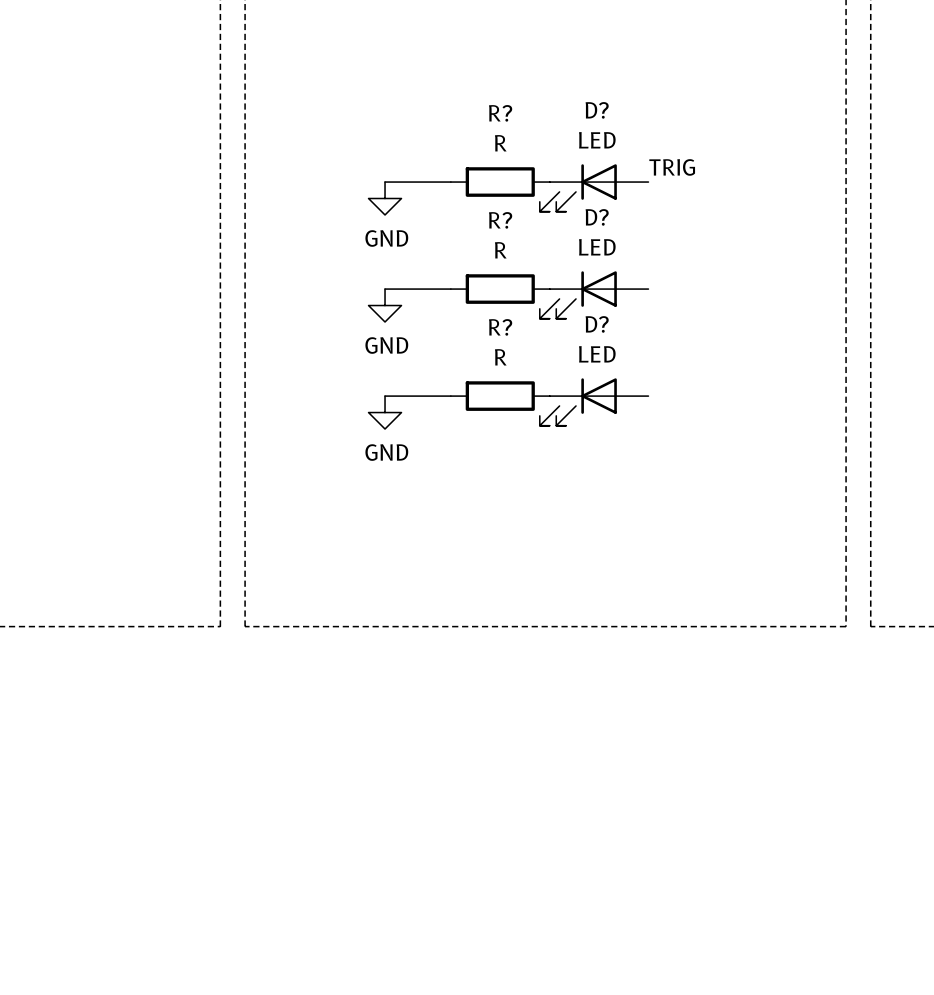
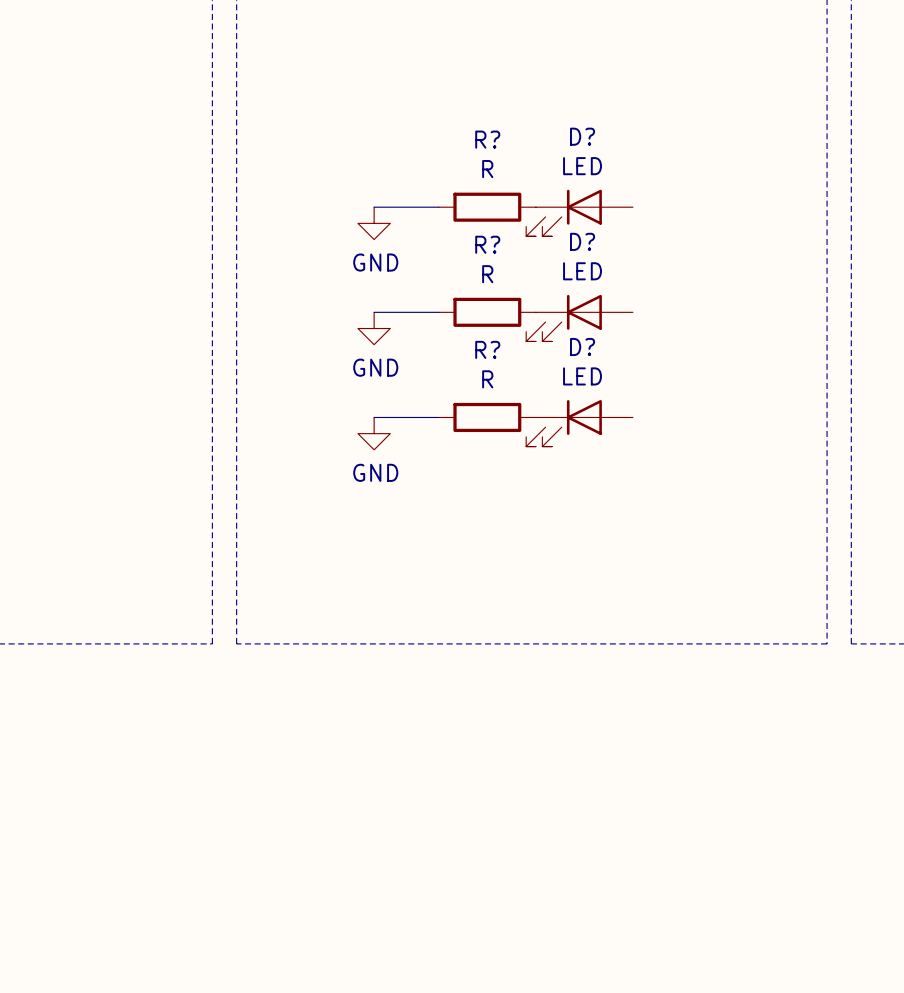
label: TRIG (672, 167) -> none

